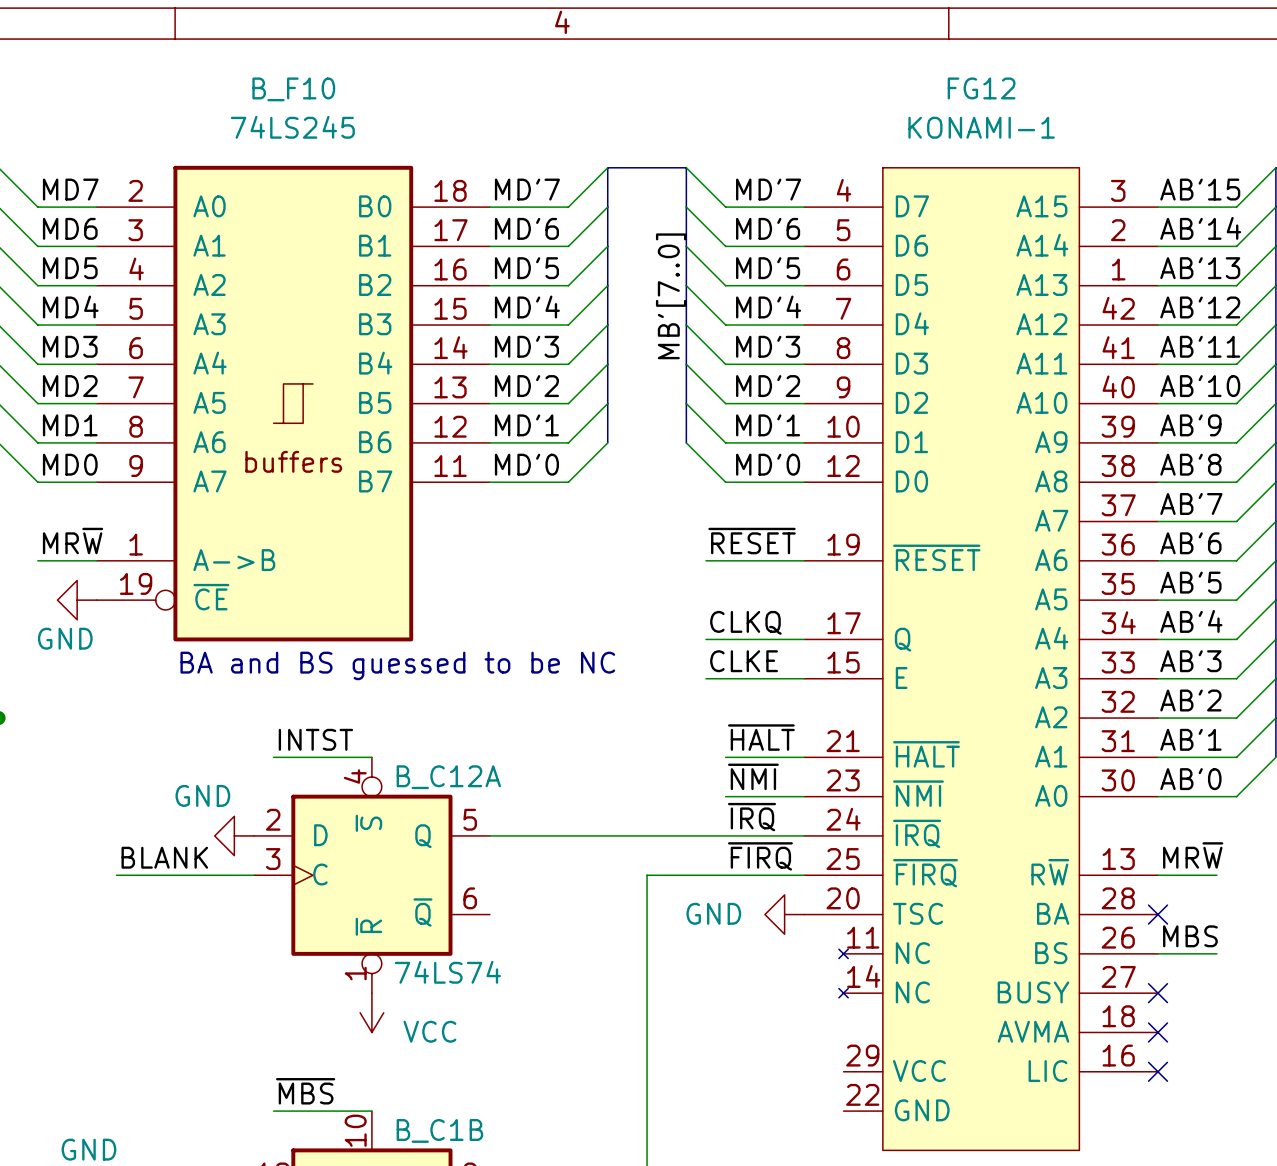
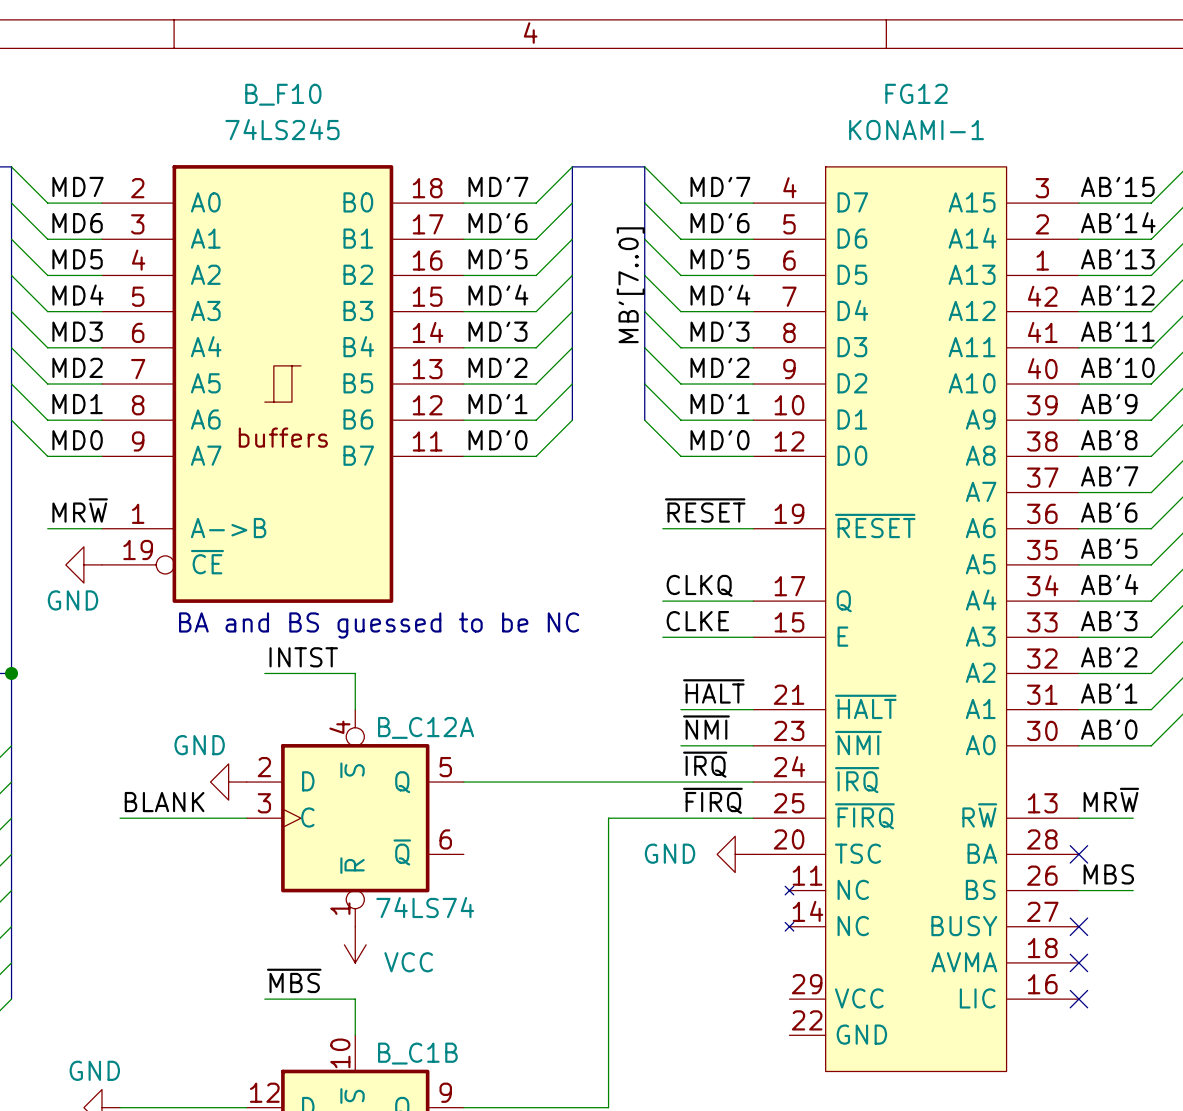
label position: INTST (315, 739) -> INTST (303, 657)
wire: (273, 757) (371, 757) -> (264, 673) (355, 673) (355, 709)
label position: ~{MBS} (305, 1091) -> ~{MBS} (294, 980)
wire: (273, 1111) (371, 1111) -> (264, 999) (355, 999) (355, 1035)

